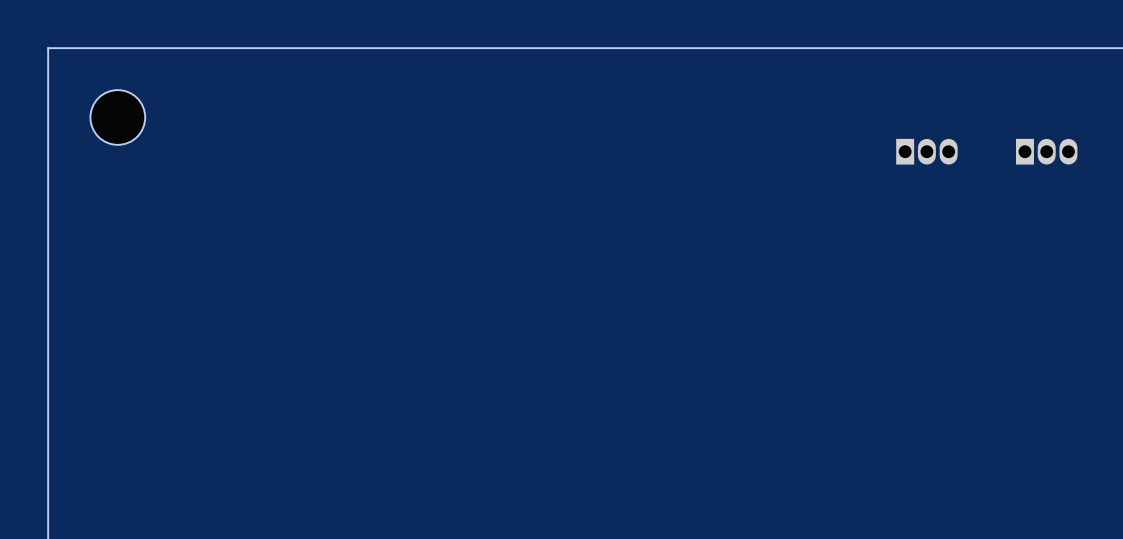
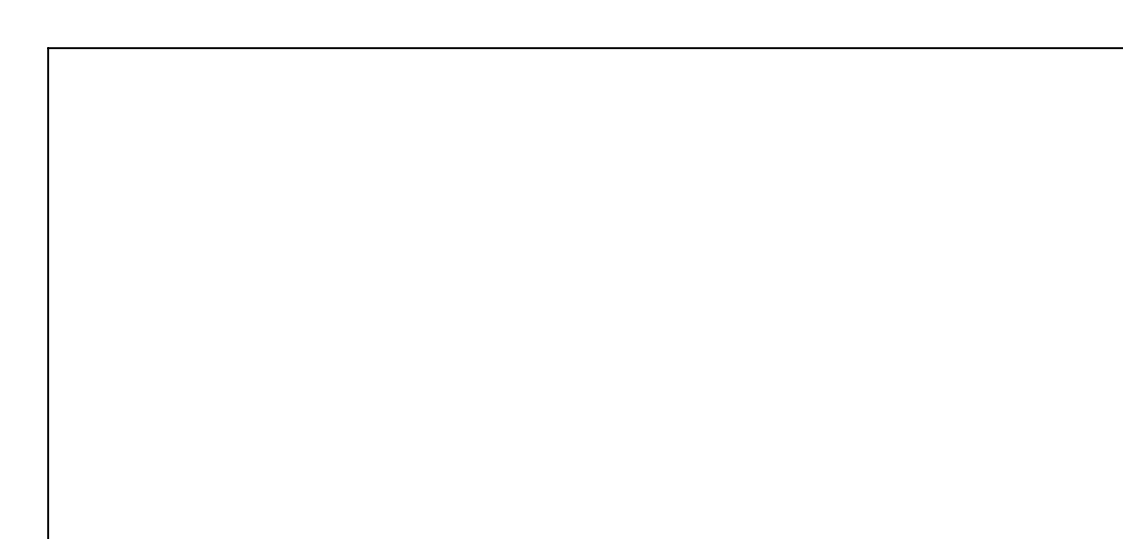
part: (117, 117) -> none
part: (926, 151) -> none
part: (1046, 151) -> none

